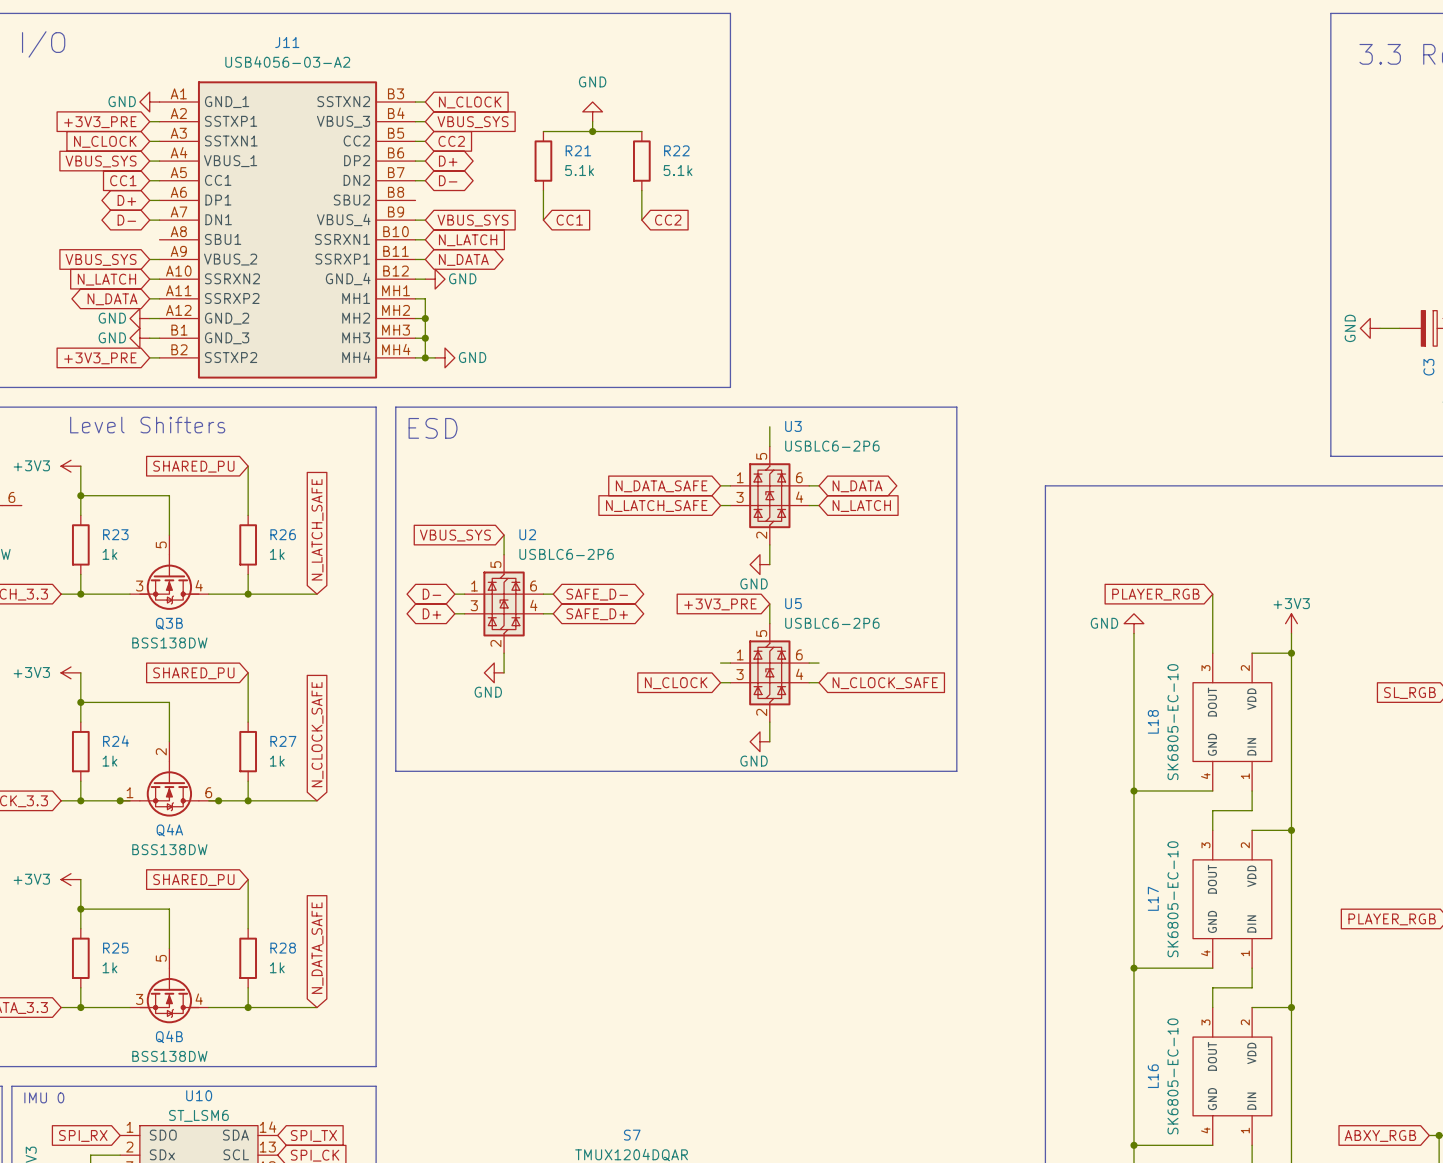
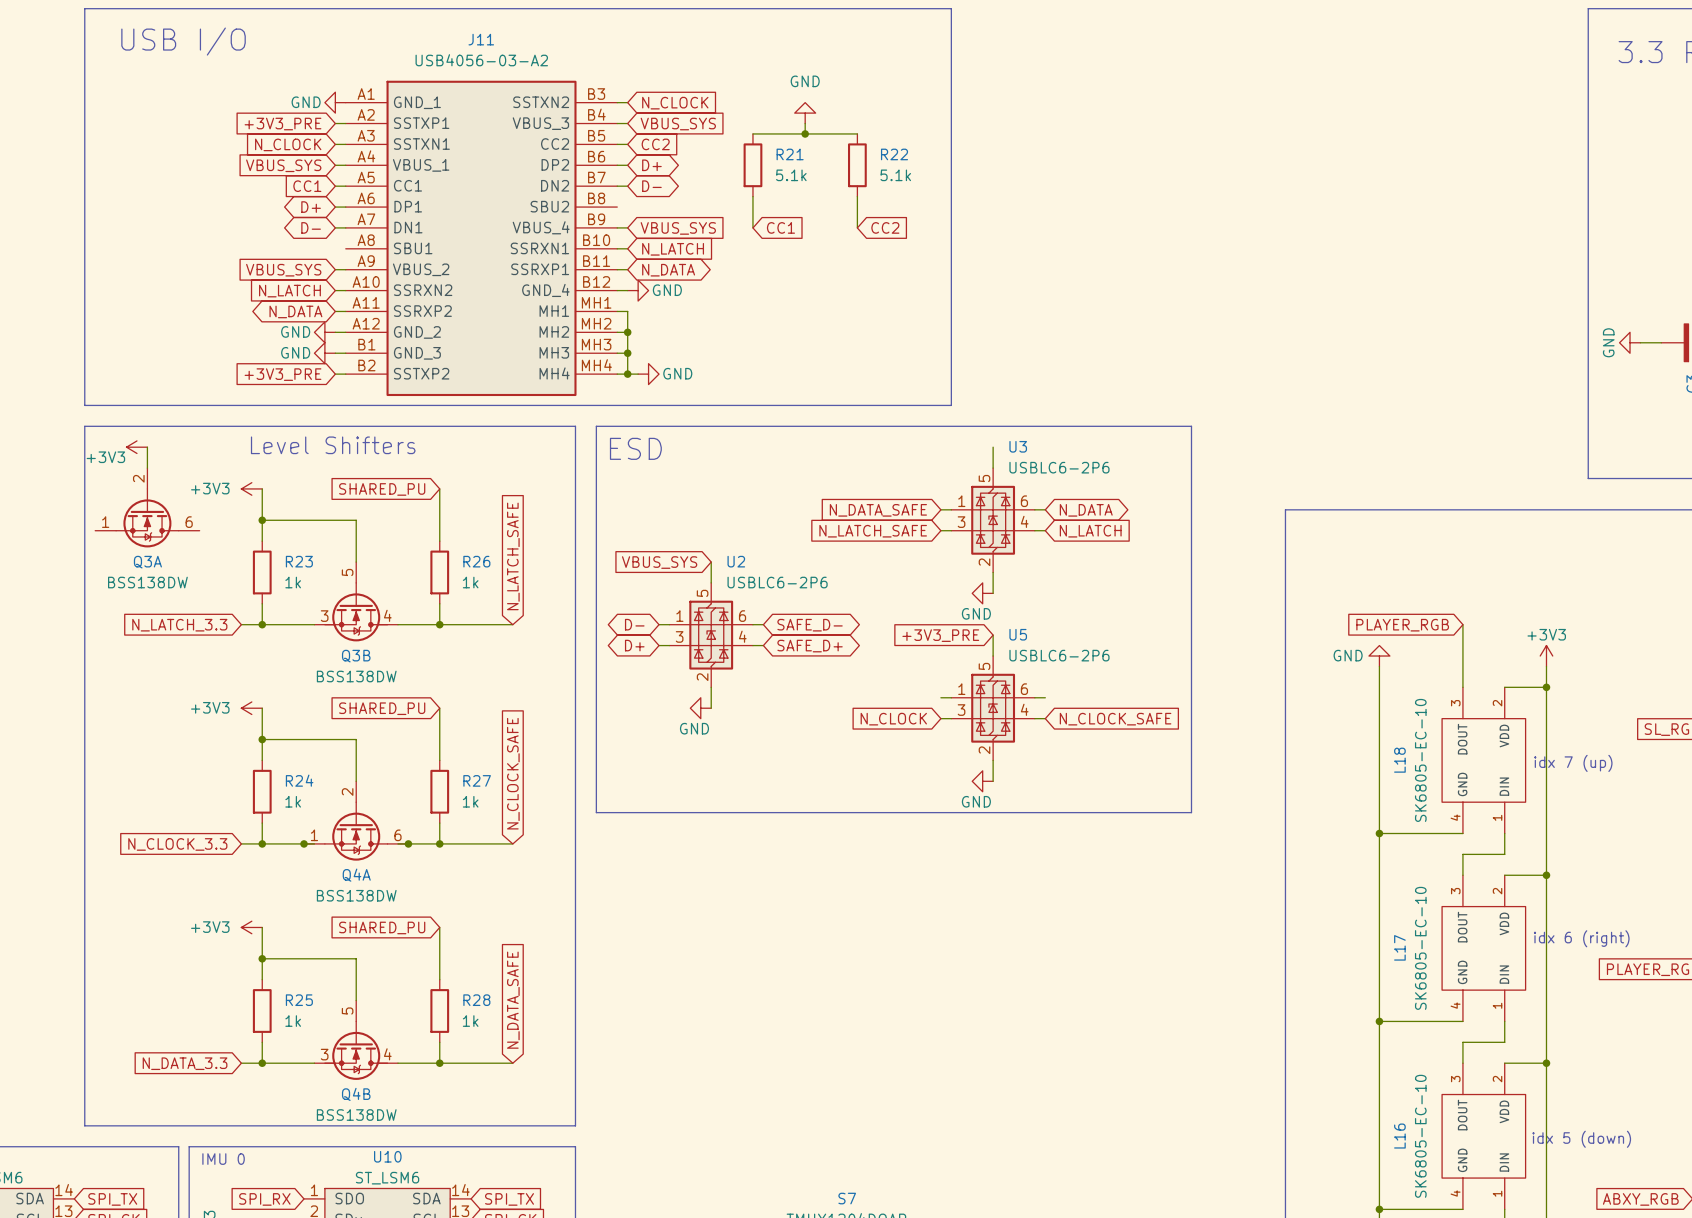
text: none -> idx 7 (up) (1573, 763)
text: none -> idx 6 (right) (1581, 938)
text: none -> idx 5 (down) (1581, 1139)

